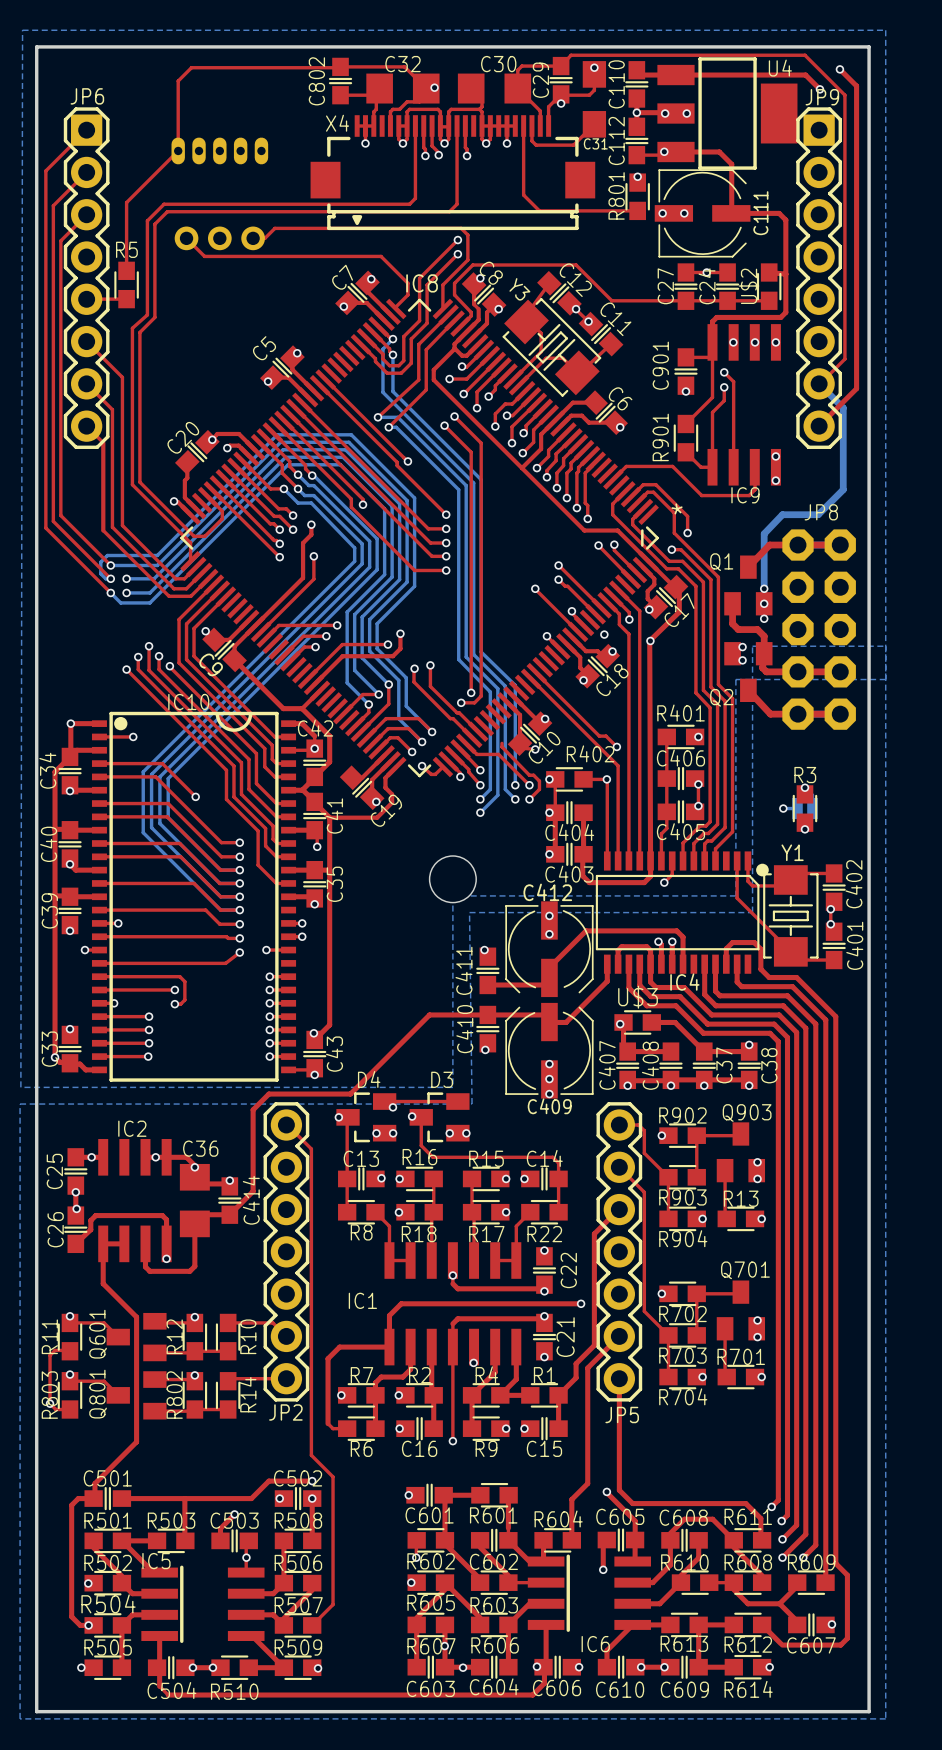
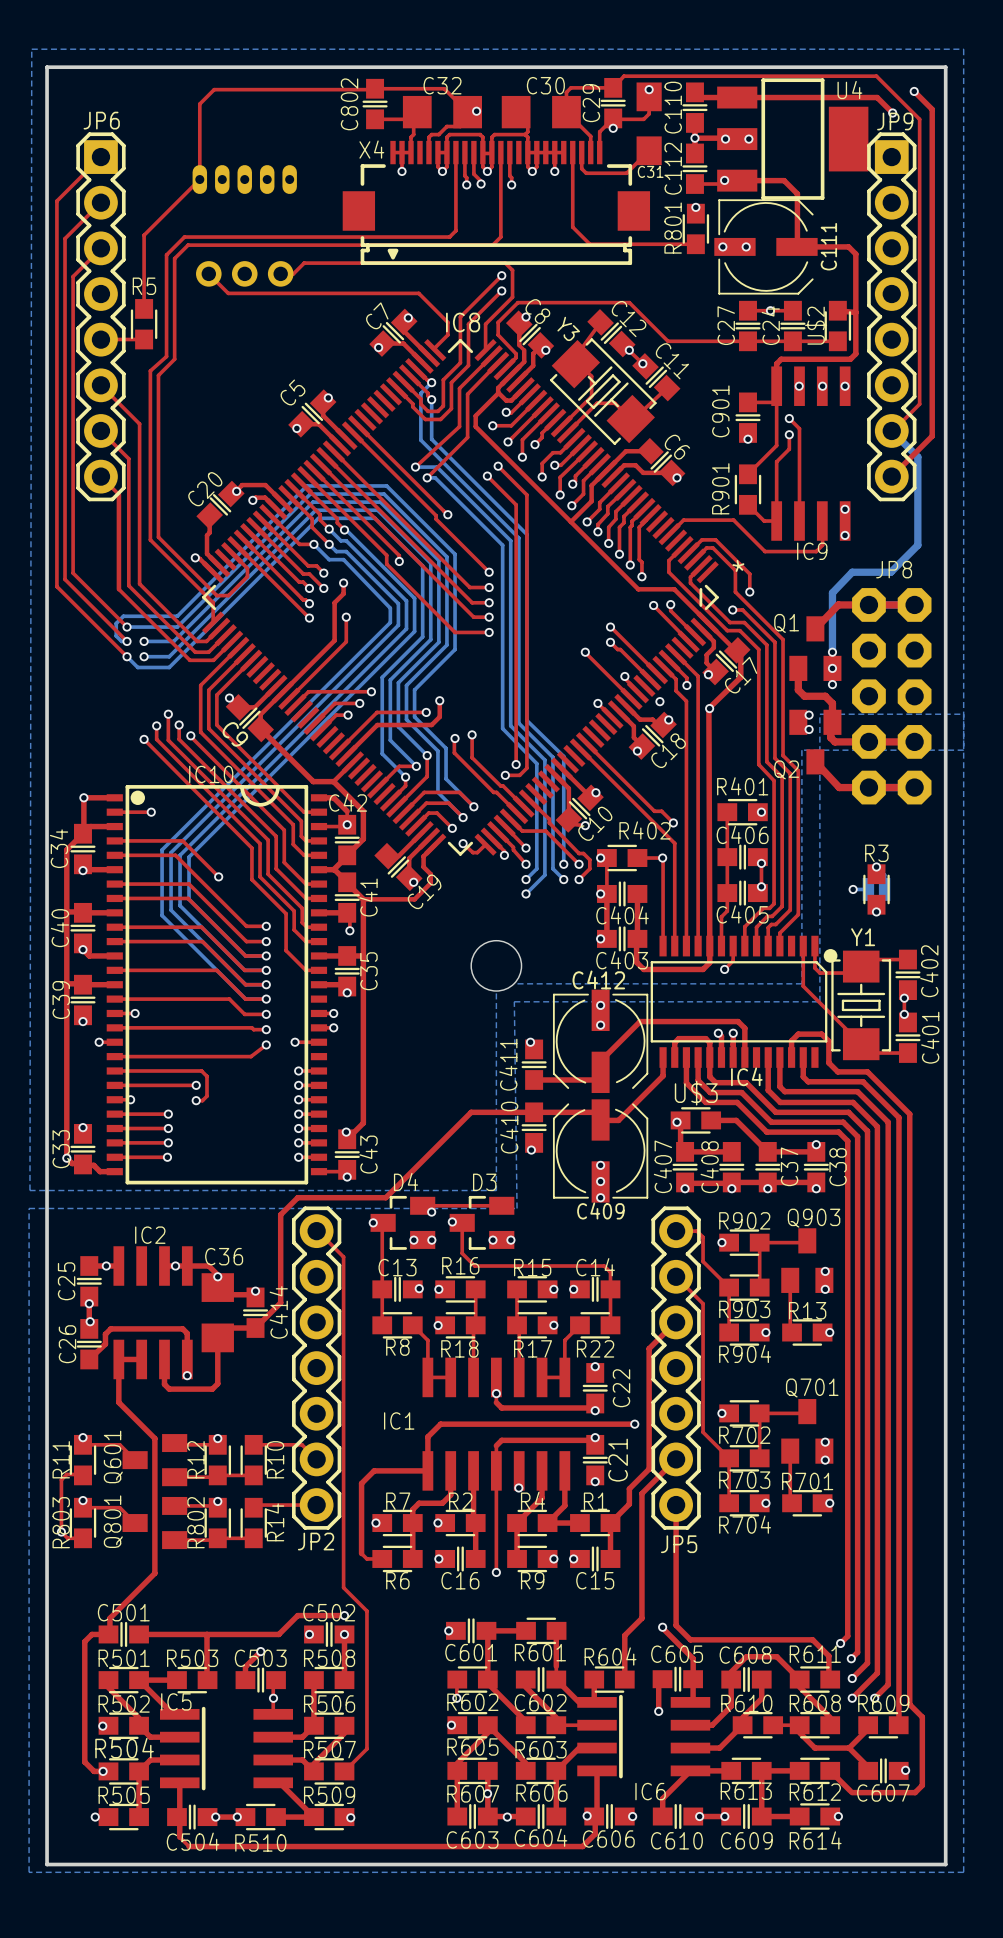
top track: none -> (529, 800) (549, 819)

